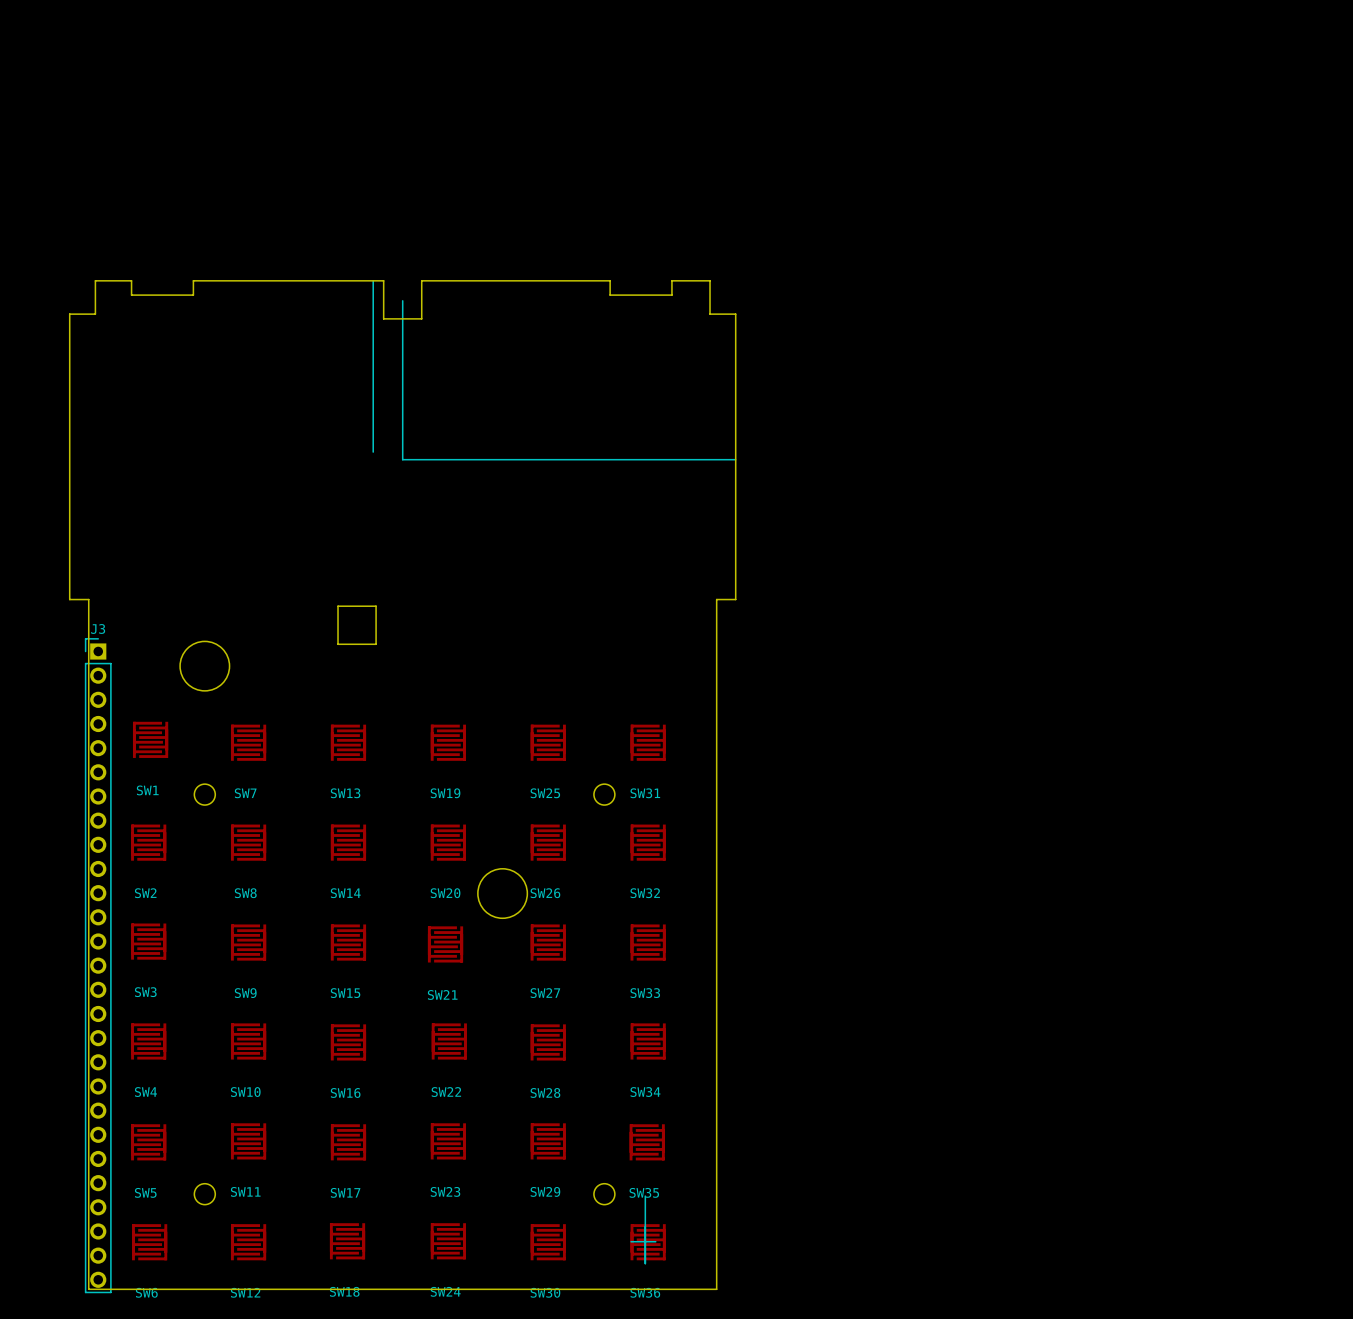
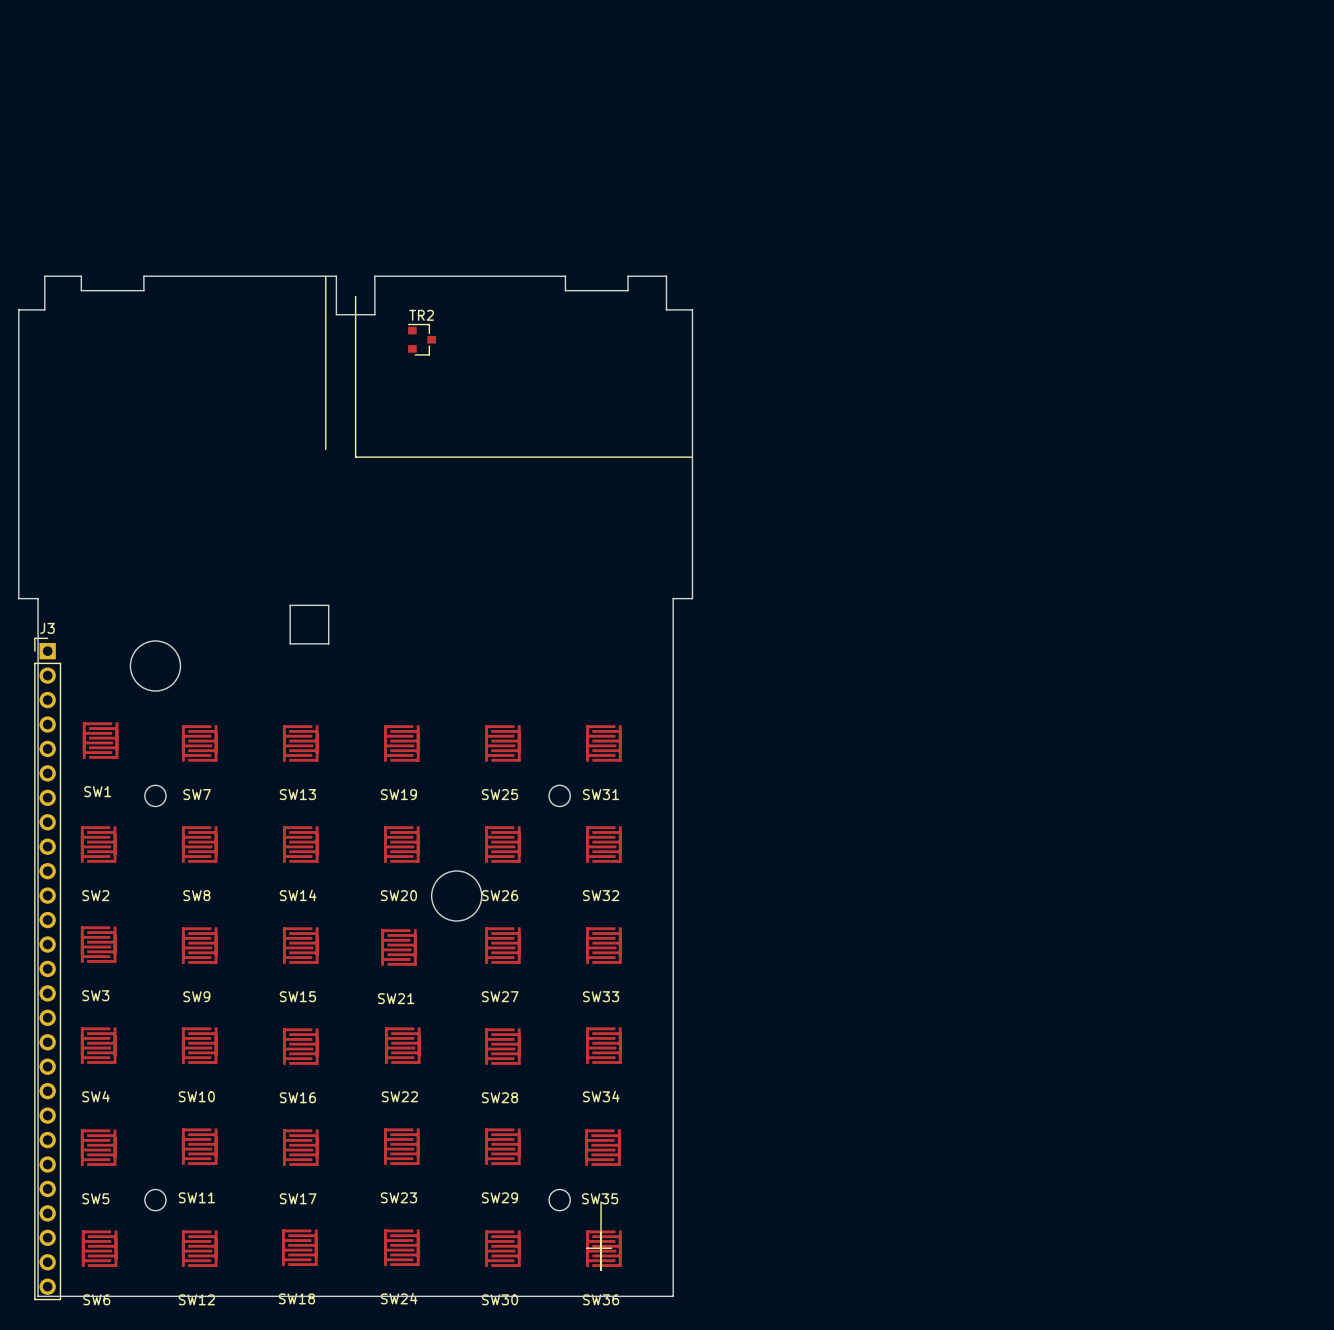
TR2: none -> (421, 339)

